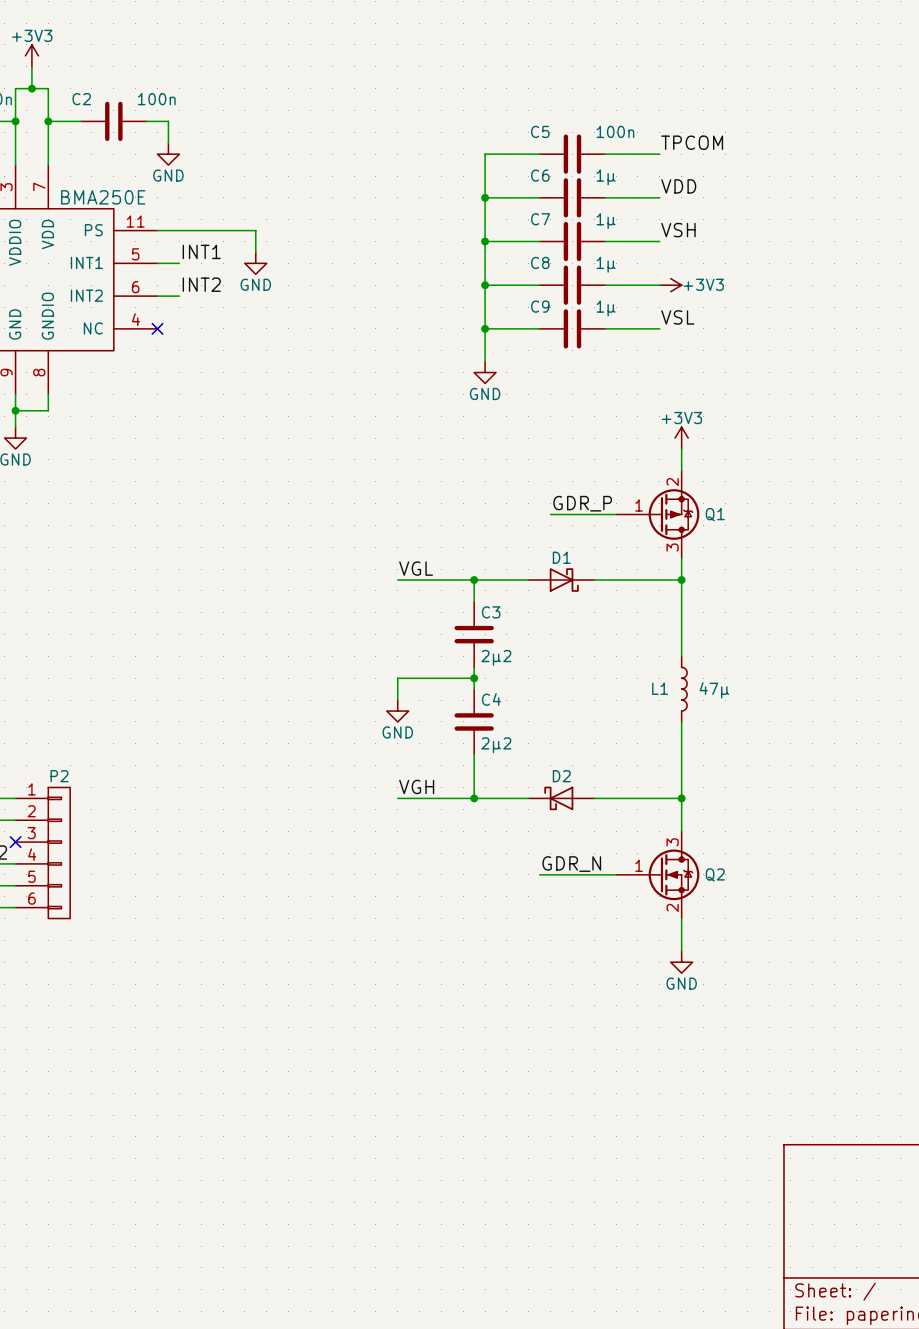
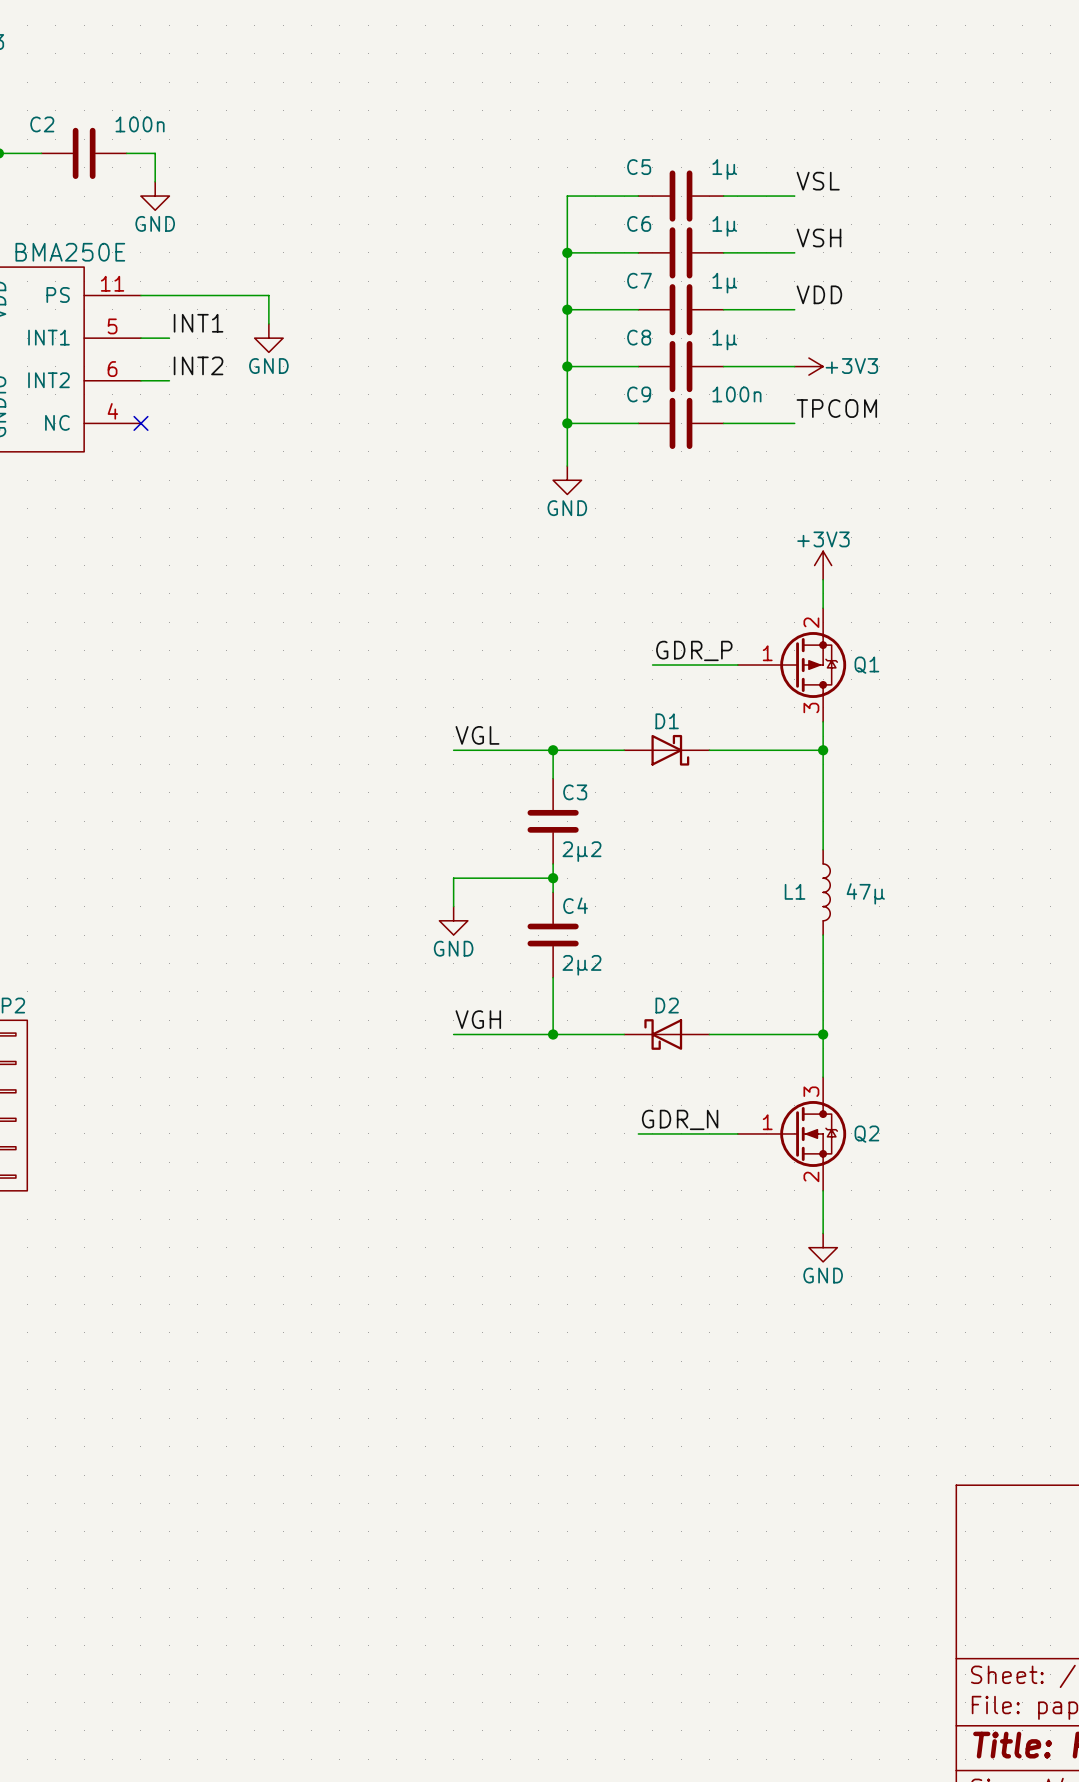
C5 value: 100n (615, 131) -> 1µ (724, 169)
label: TPCOM (692, 142) -> VSL (818, 181)
label: VDD (678, 186) -> VSH (818, 238)
label: VSH (678, 230) -> VDD (819, 294)
C9 value: 1µ (606, 308) -> 100n (736, 394)
label: VSL (677, 317) -> TPCOM (836, 408)

